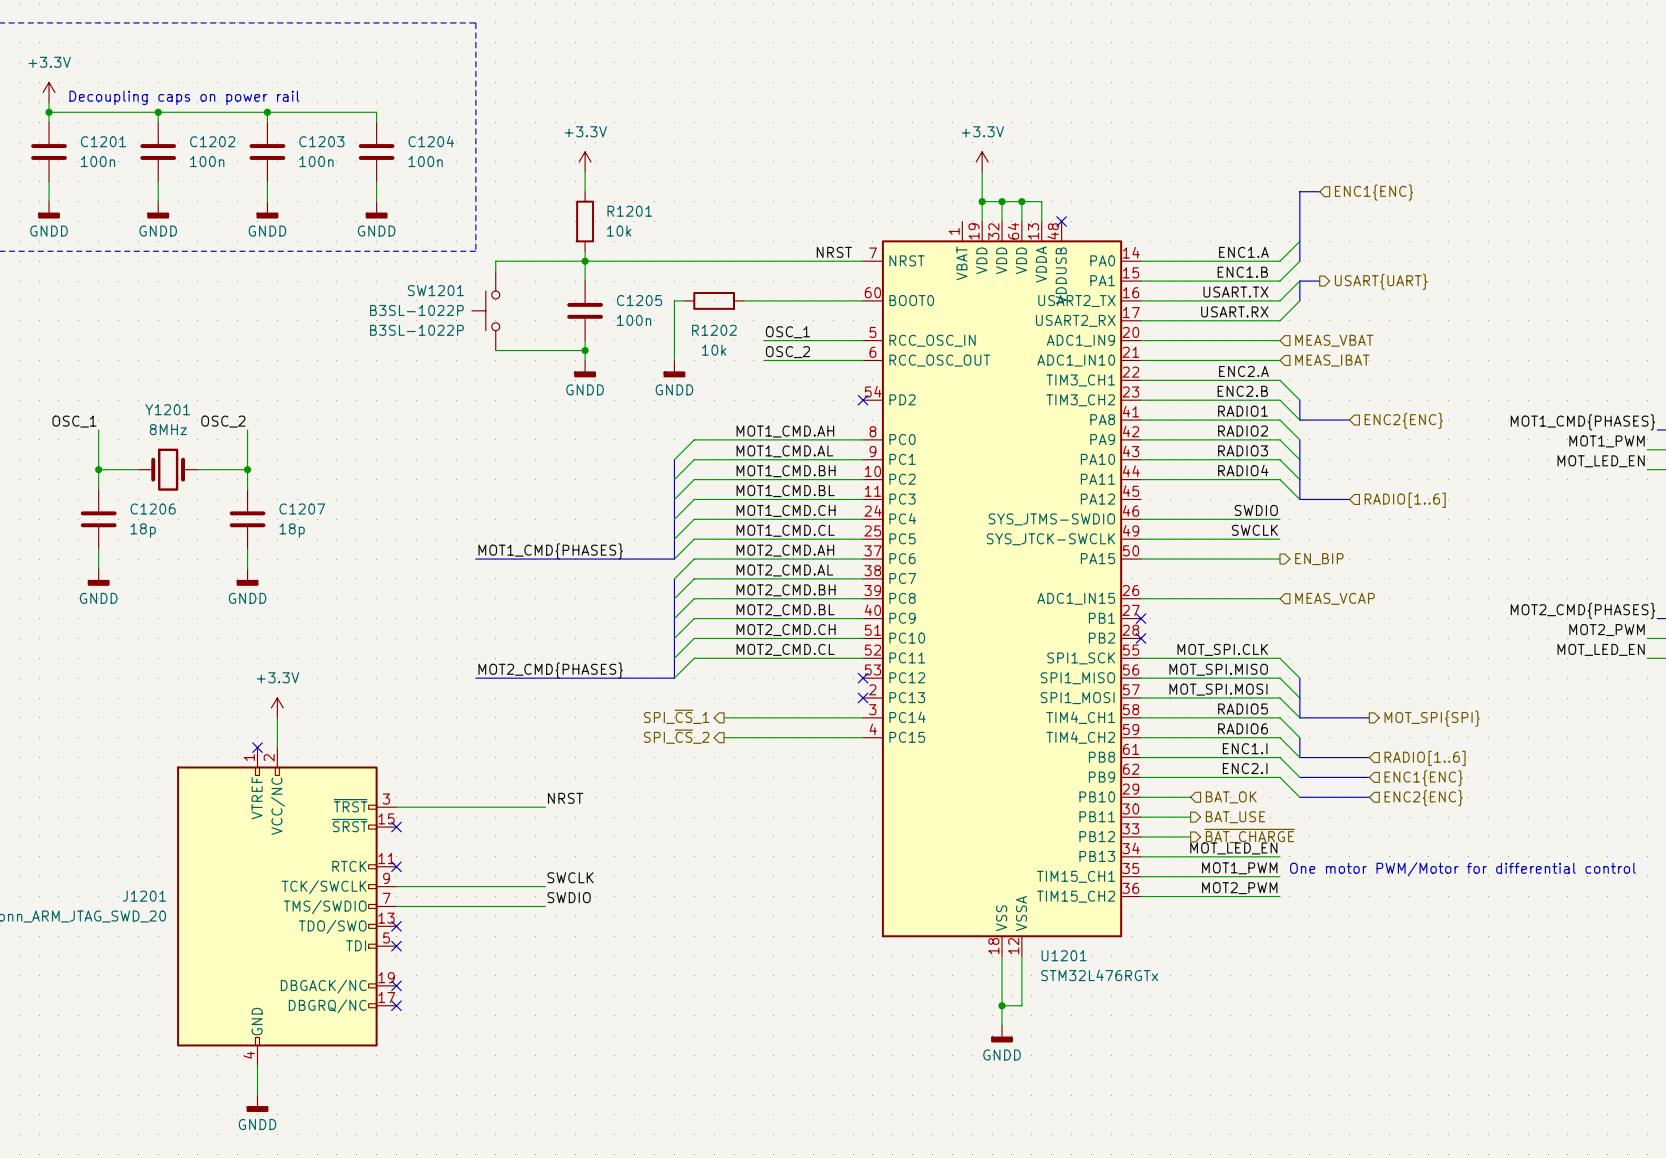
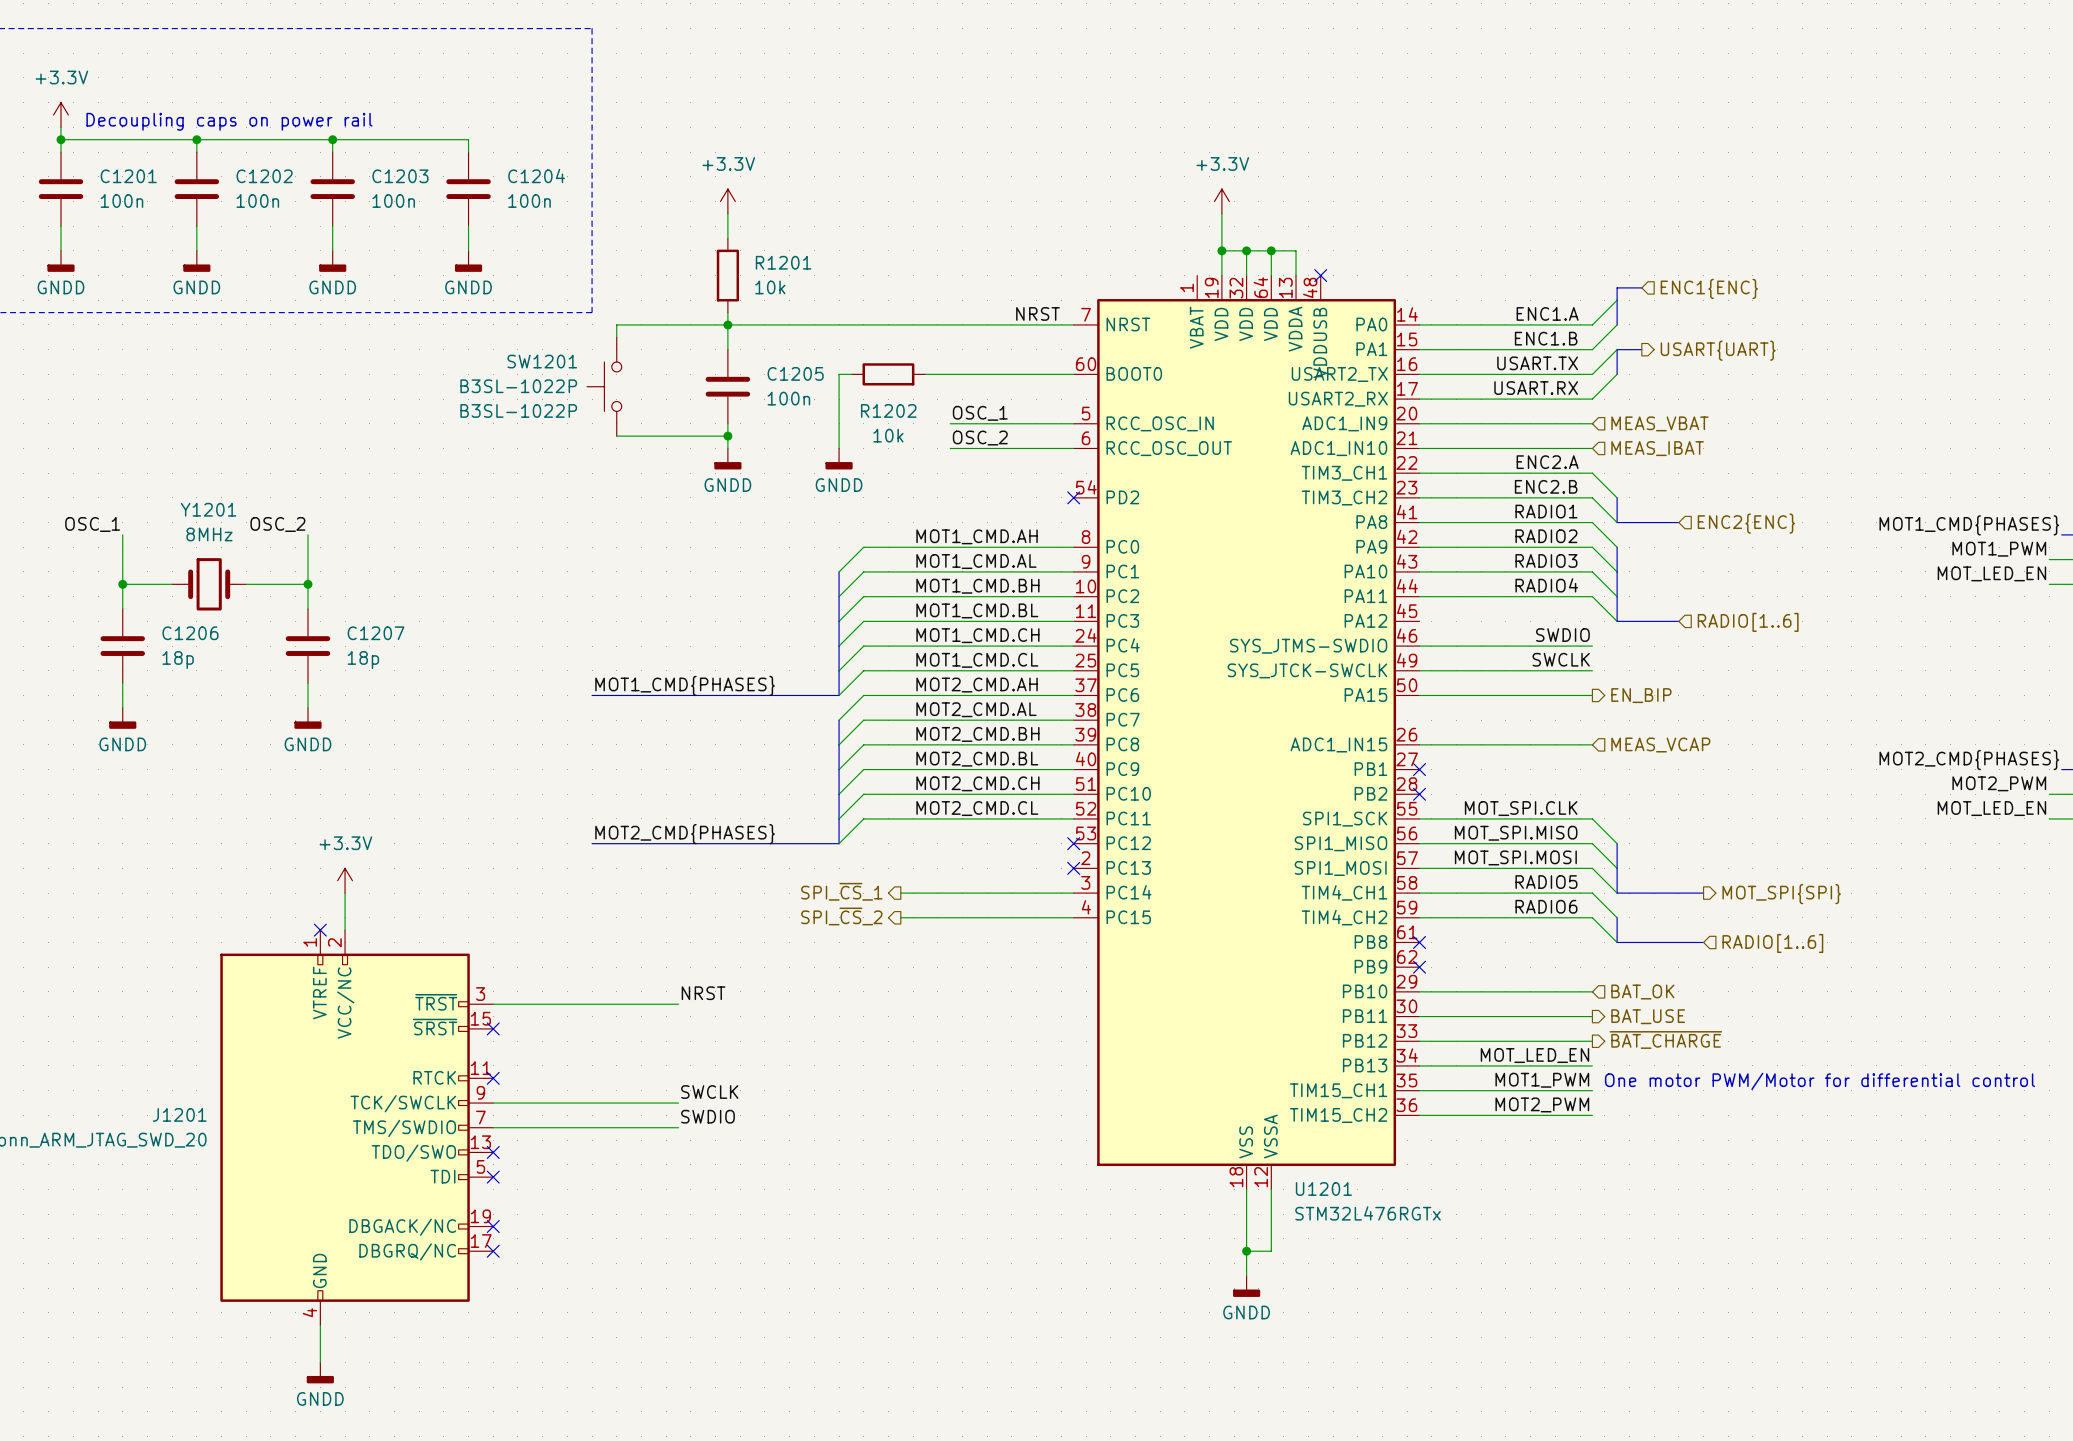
bus: (1319, 191) (1299, 191) (1299, 231) -> (1641, 287) (1617, 287)
hierarchical label position: ENC1{ENC} (1373, 192) -> ENC1{ENC} (1709, 288)
label: ENC1.I (1245, 748) -> none
wire: (1141, 757) (1279, 757) (1299, 777) -> none
no-connect mark: none -> (1419, 942)
label: ENC2.I (1245, 768) -> none
wire: (1141, 777) (1279, 777) (1299, 797) -> none
no-connect mark: none -> (1419, 967)
bus: (1299, 777) (1369, 777) -> none
hierarchical label: ENC1{ENC} (1423, 778) -> none
wire: none -> (1481, 991) (1592, 991)
hierarchical label position: BAT_OK (1231, 797) -> BAT_OK (1642, 992)
bus: (1299, 797) (1369, 797) -> none
hierarchical label: ENC2{ENC} (1423, 798) -> none
wire: none -> (1481, 1016) (1592, 1016)
hierarchical label position: BAT_USE (1235, 817) -> BAT_USE (1648, 1016)
hierarchical label position: ~{BAT_CHARGE} (1249, 835) -> ~{BAT_CHARGE} (1665, 1039)
wire: none -> (1481, 1041) (1592, 1041)

